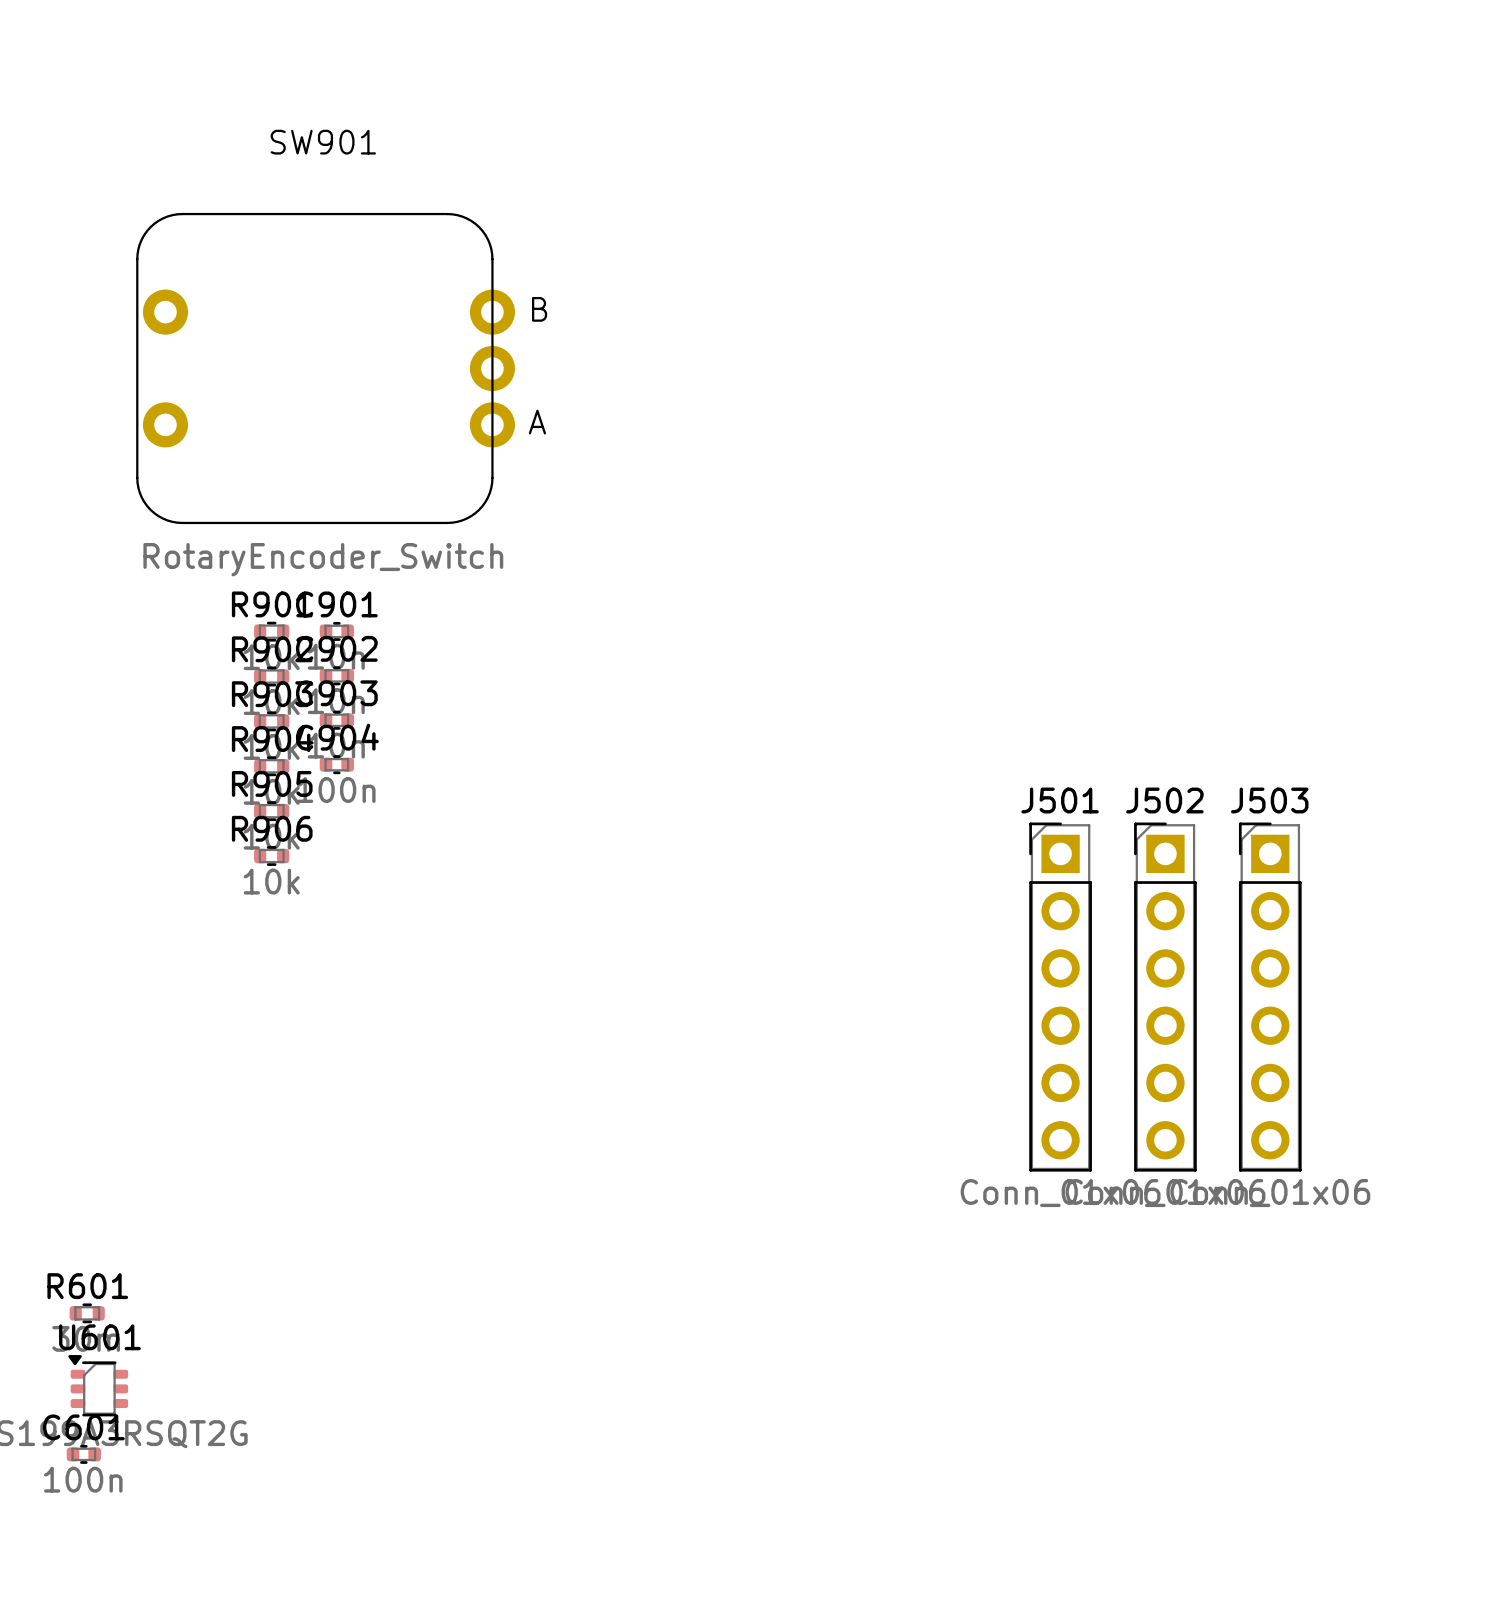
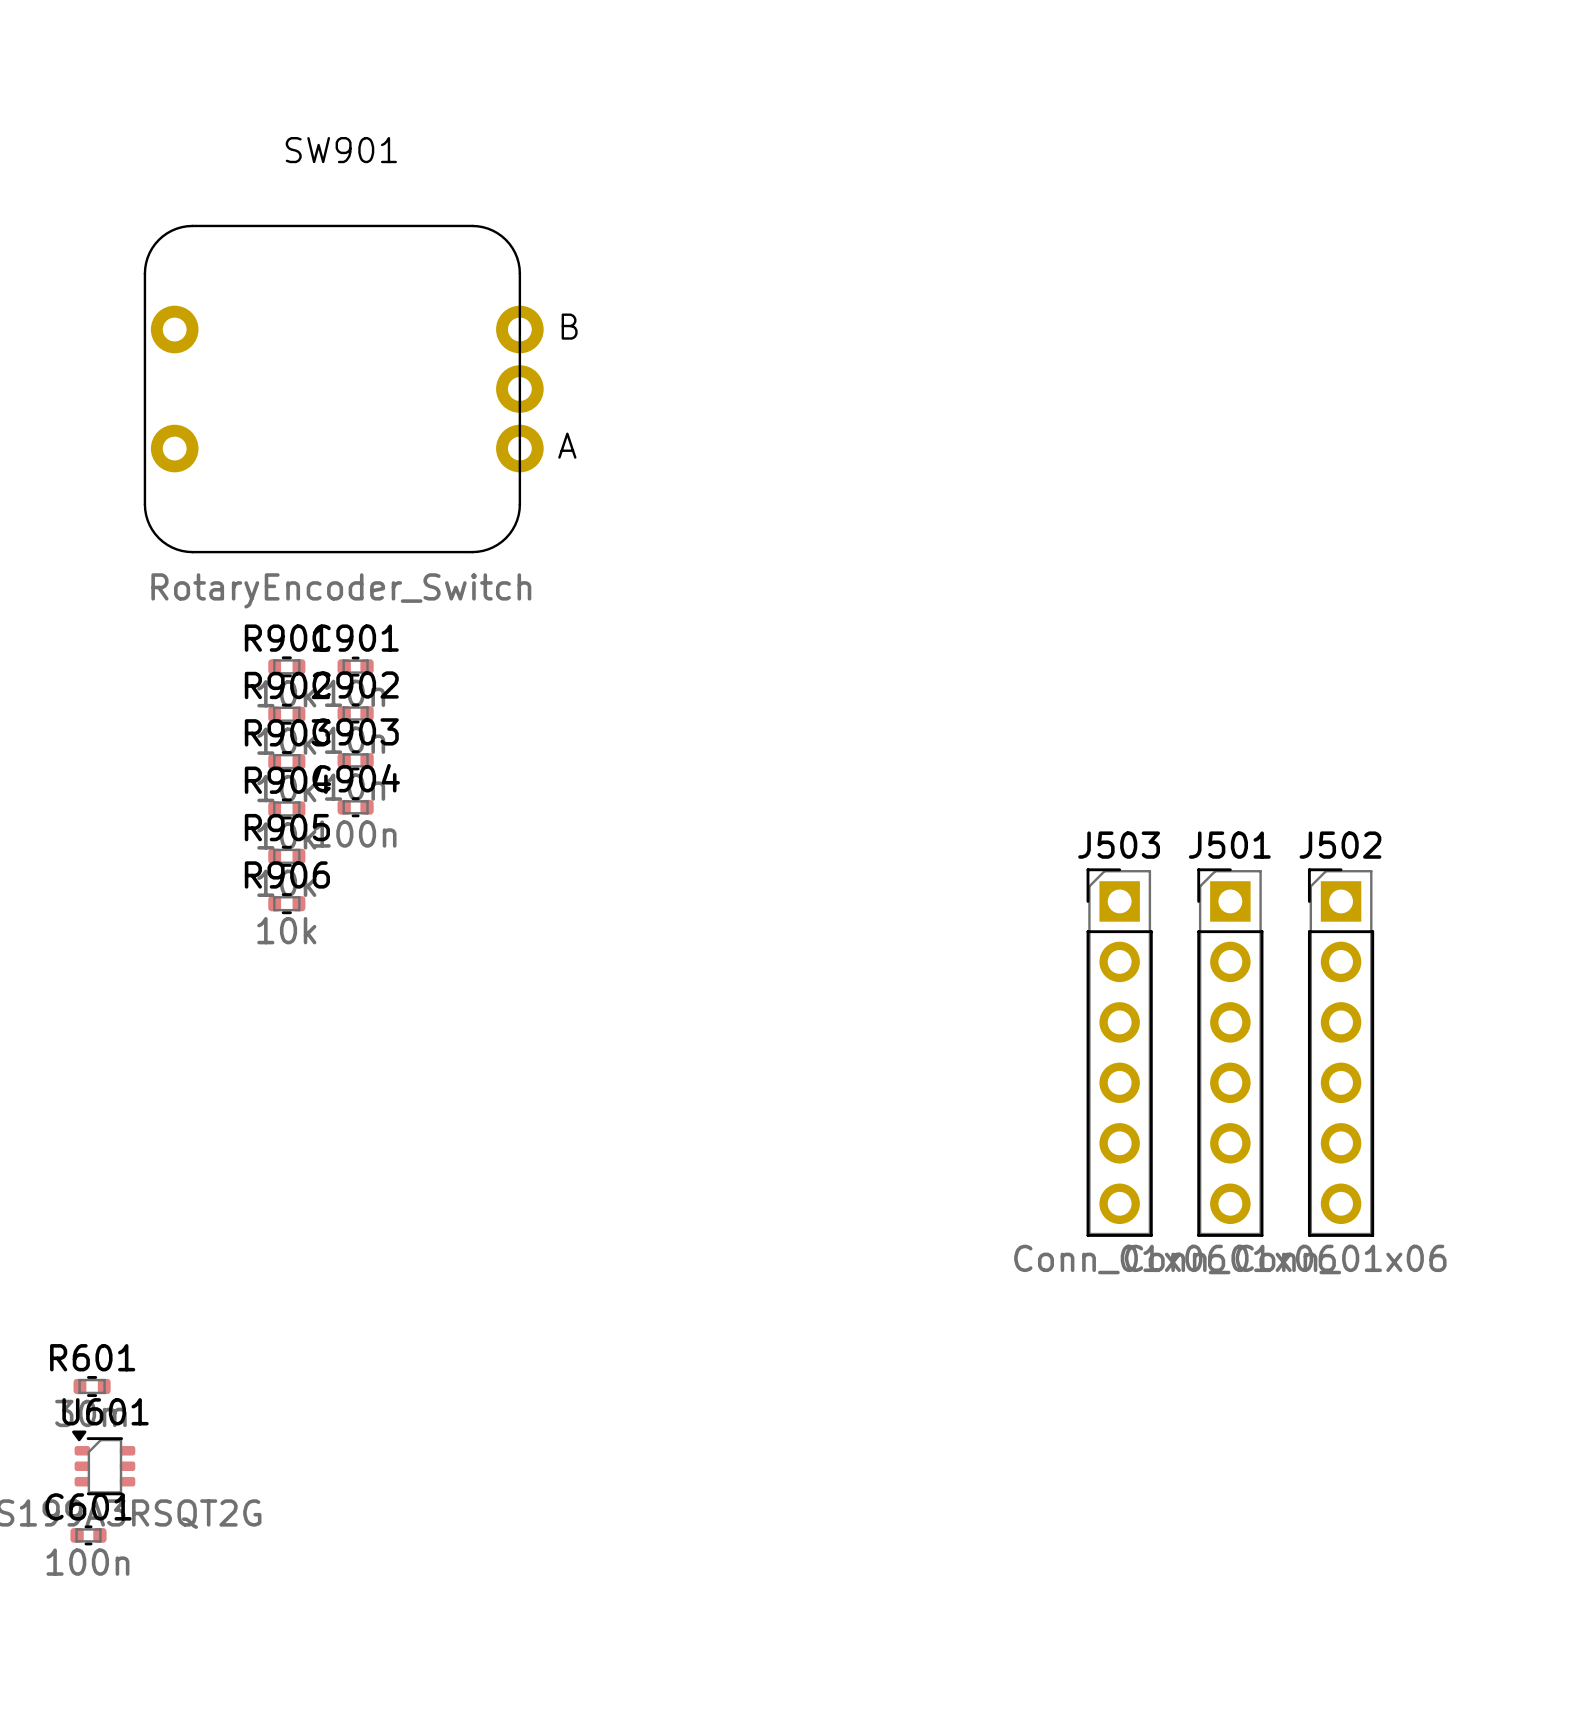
J501 name: J501 (1060, 800) -> J503 (1119, 845)
J502 name: J502 (1164, 800) -> J501 (1229, 845)
J503 name: J503 (1269, 800) -> J502 (1340, 845)

